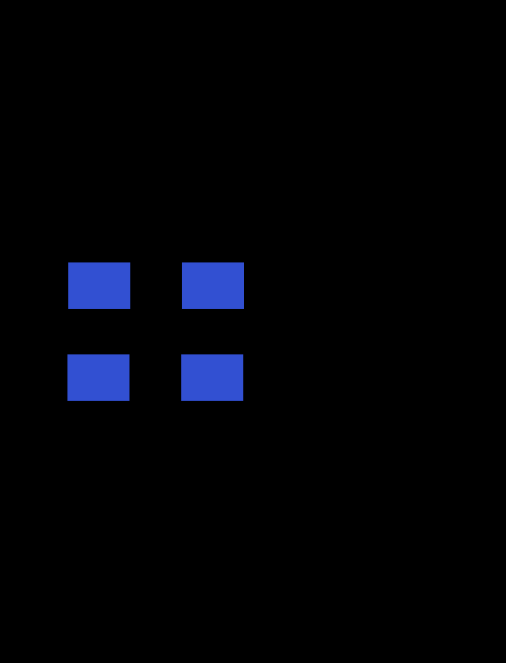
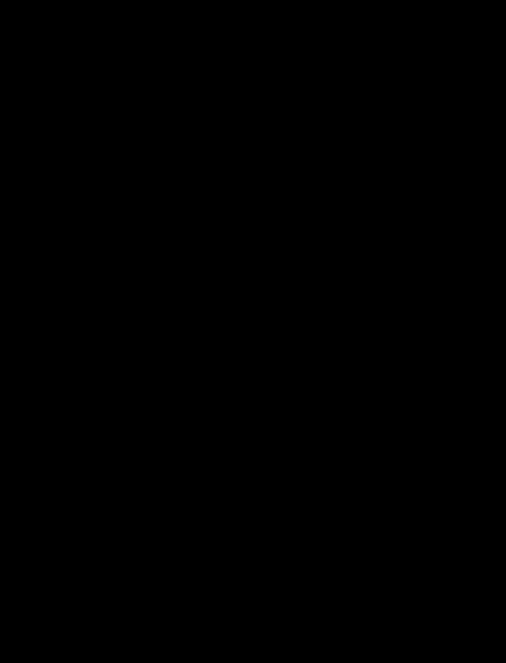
part: (156, 285) -> none
part: (155, 377) -> none

